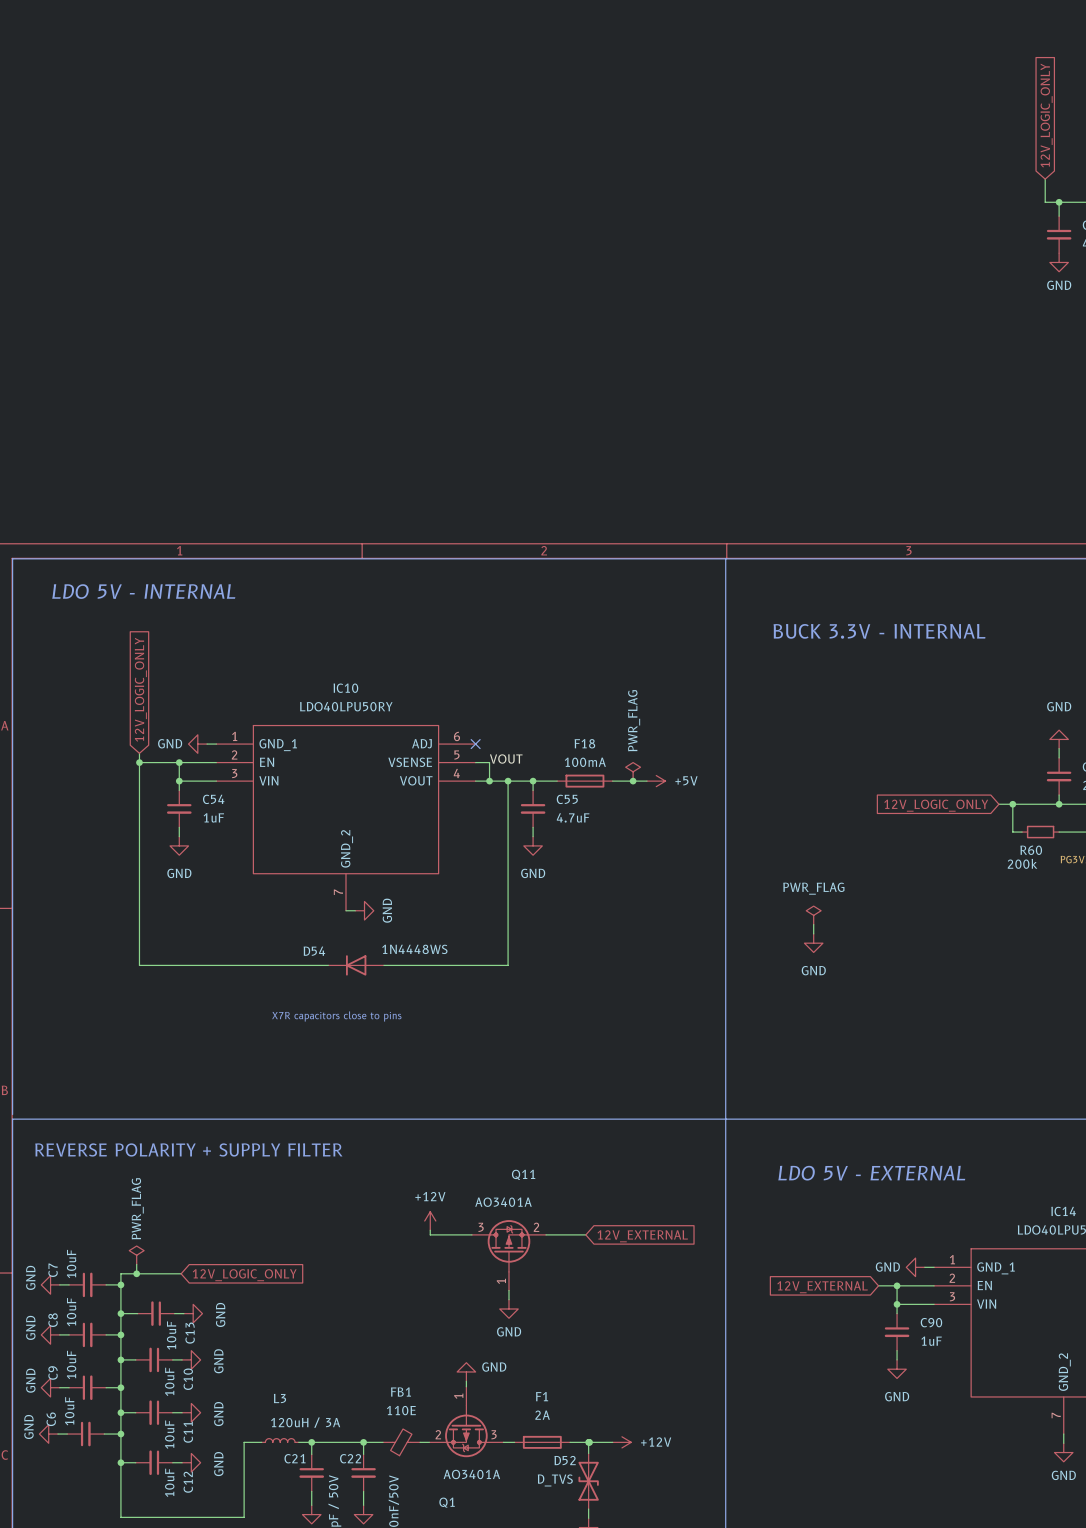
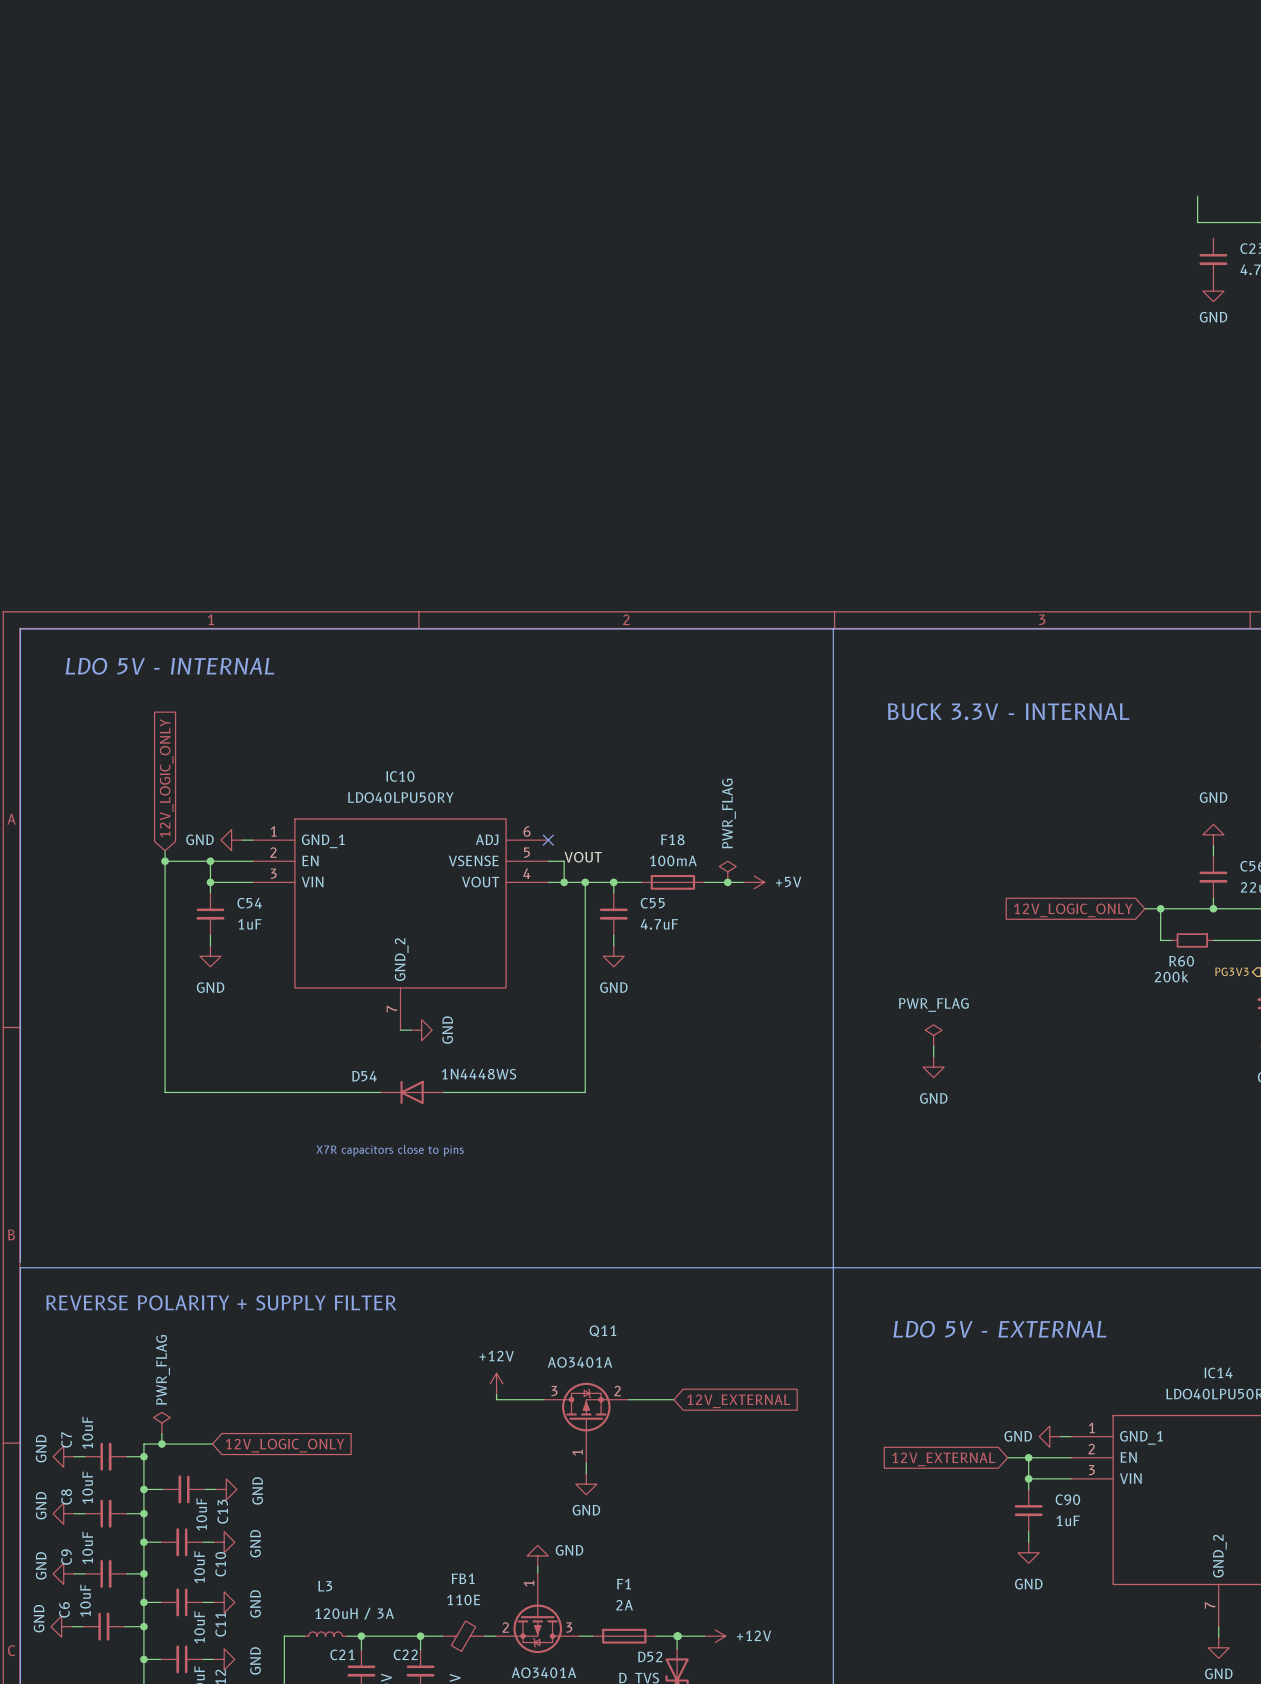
global label: 12V_LOGIC_ONLY (1046, 115) -> none
wire: (1059, 202) (1059, 216) -> none
junction: (1059, 202) -> none

